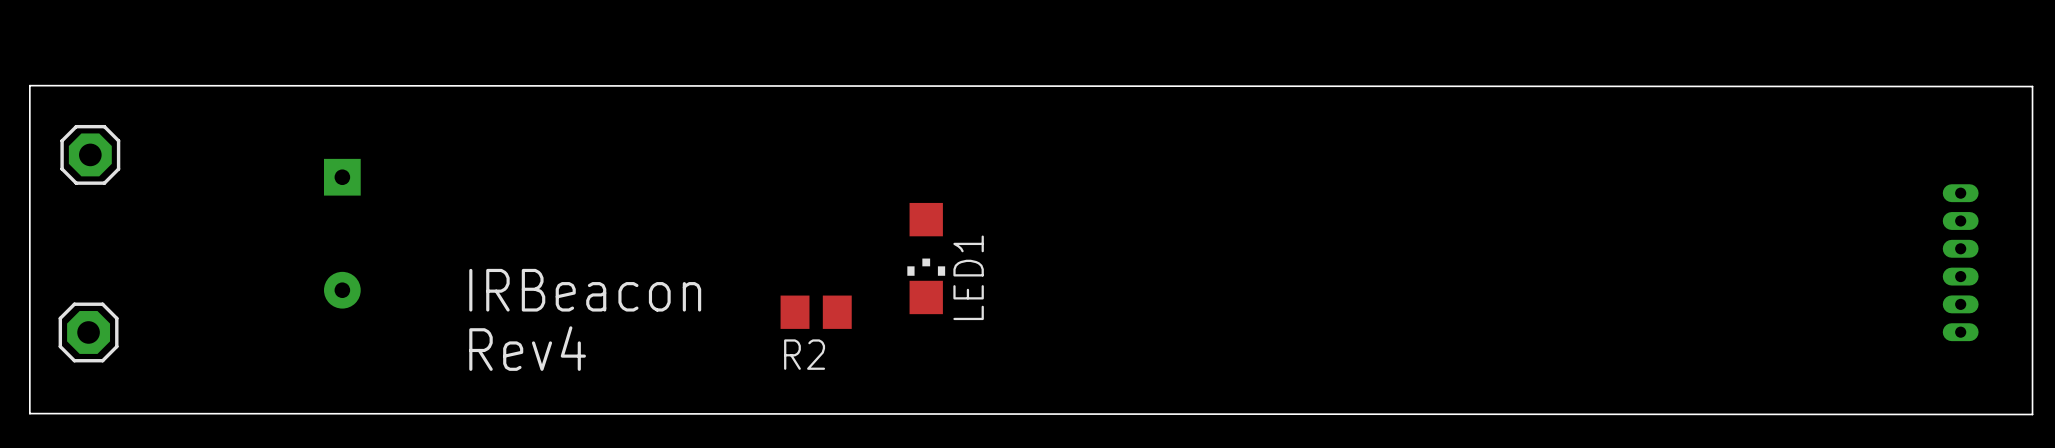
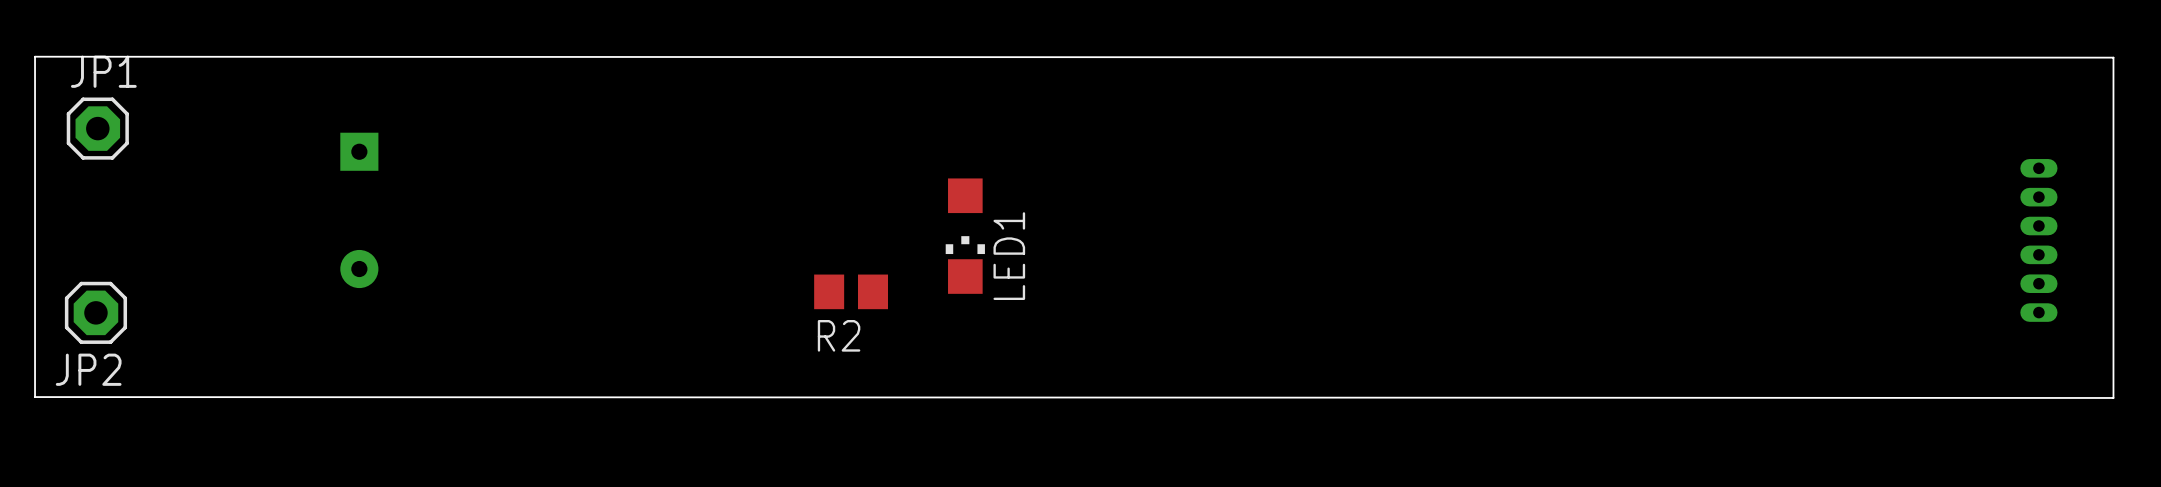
JP1 name: none -> JP1 (103, 71)
text: IRBeacon (585, 290) -> none
text: Rev4 (527, 348) -> none
JP2 name: none -> JP2 (88, 369)

